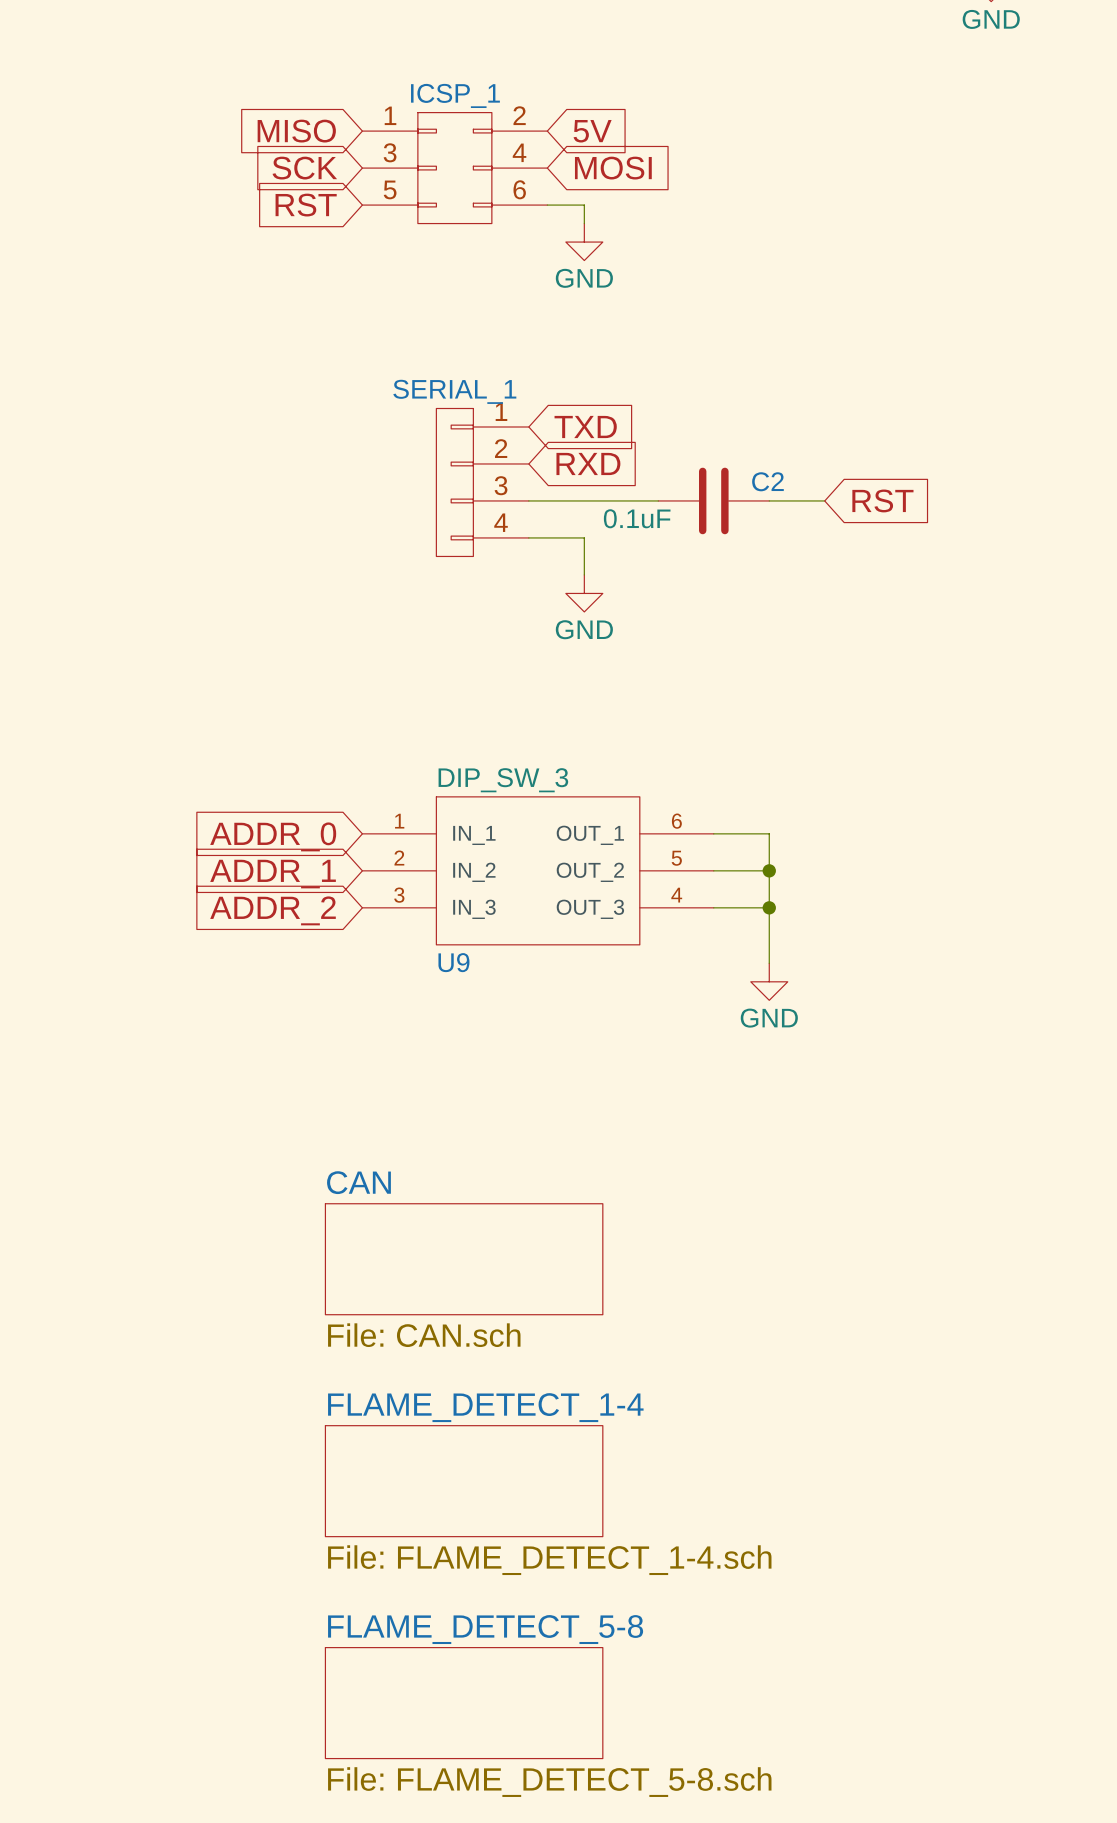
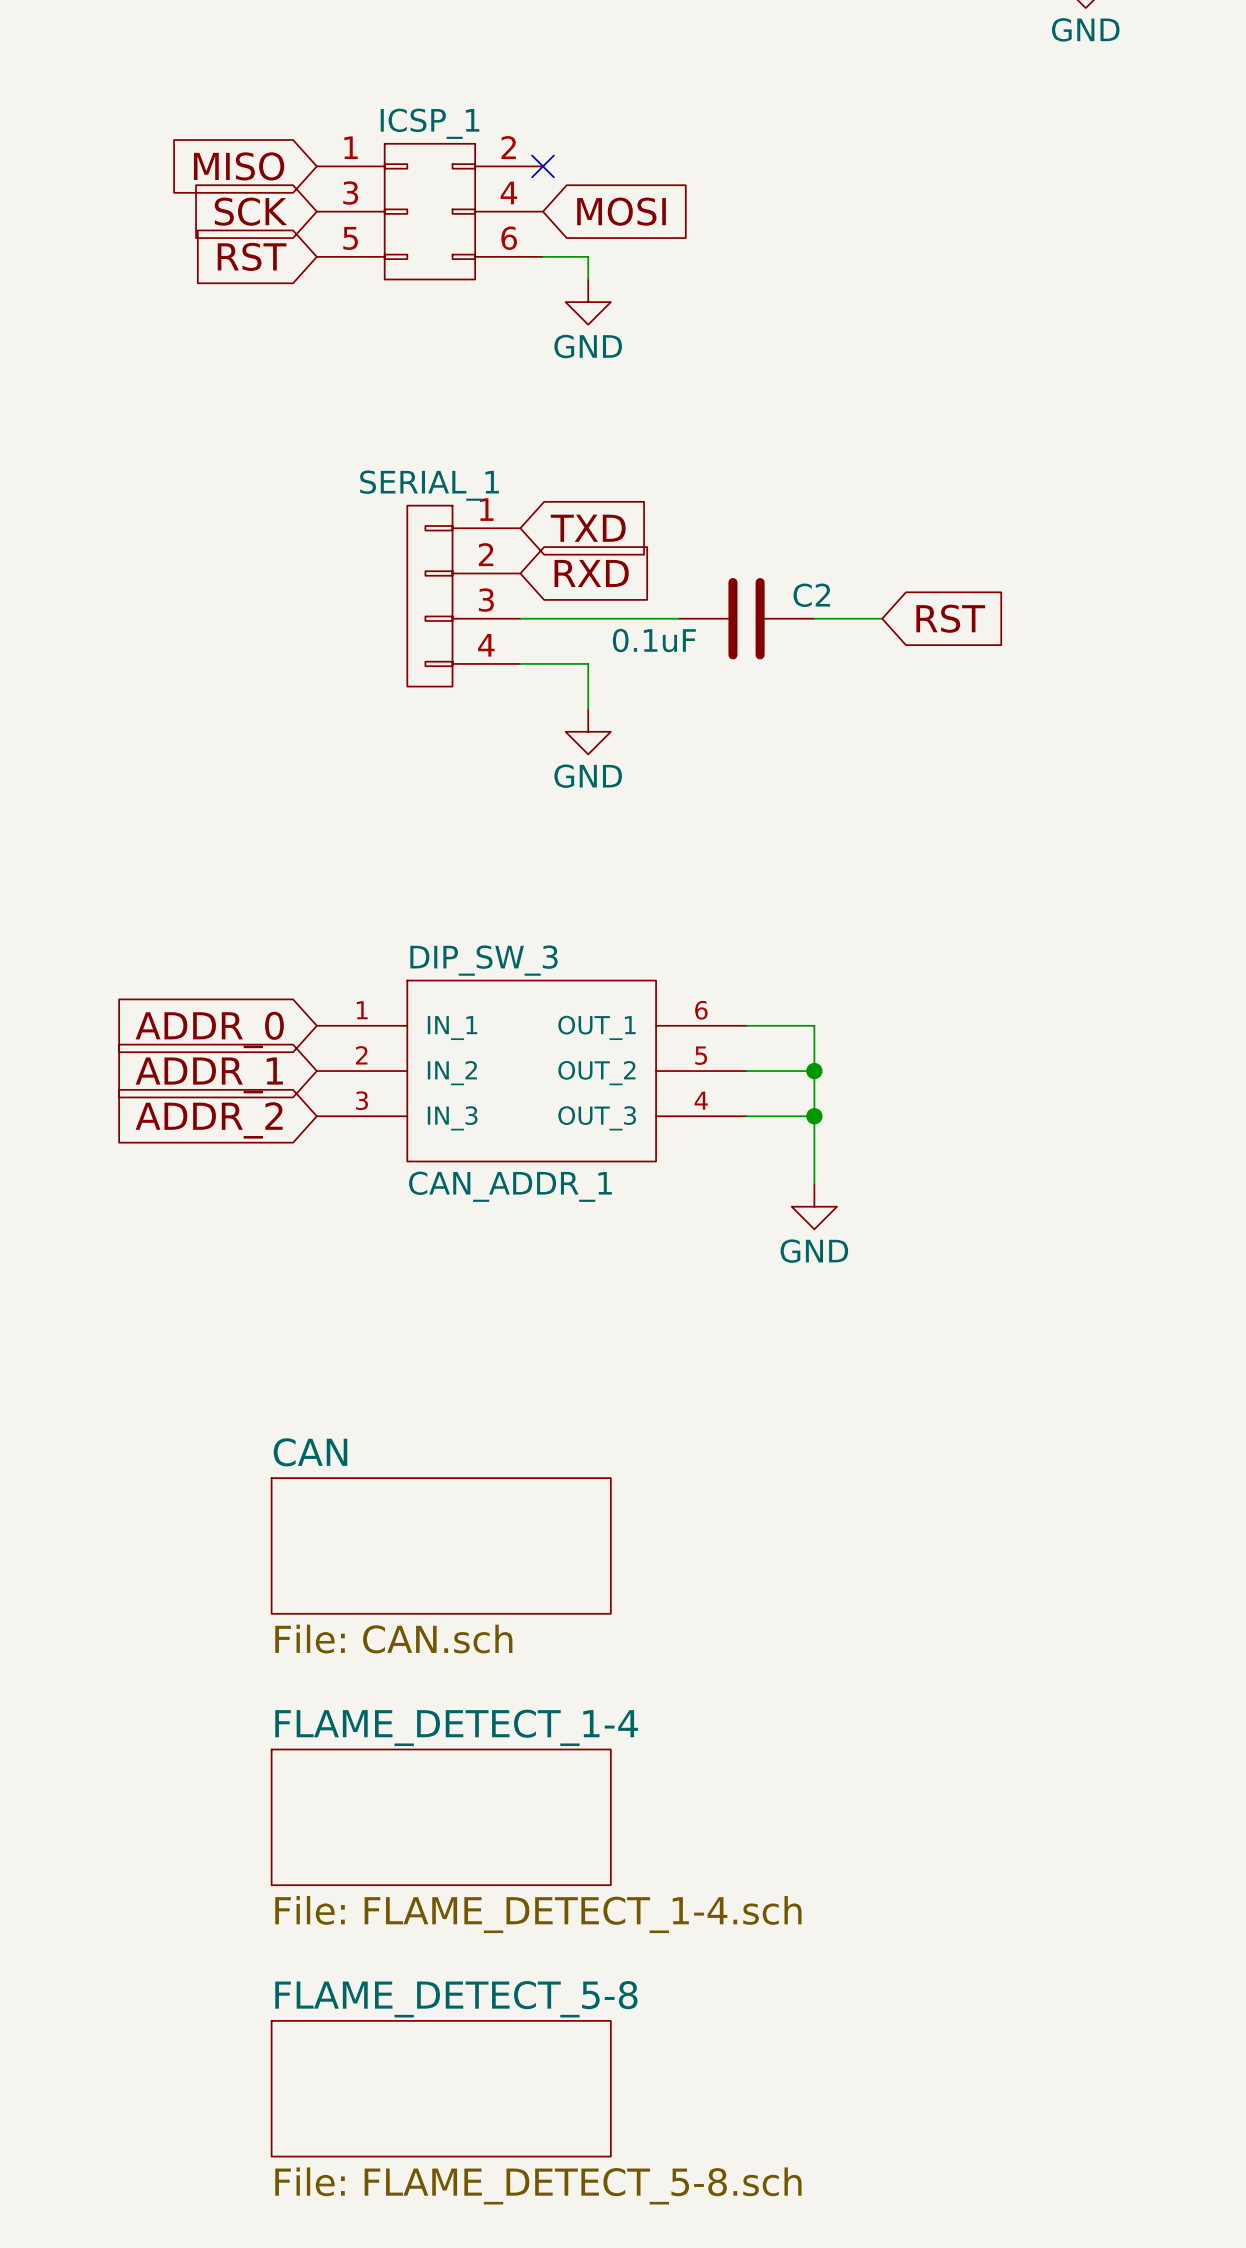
no-connect mark: none -> (542, 166)
global label: 5V (592, 131) -> none
U9 name: U9 (453, 962) -> CAN_ADDR_1 (510, 1186)

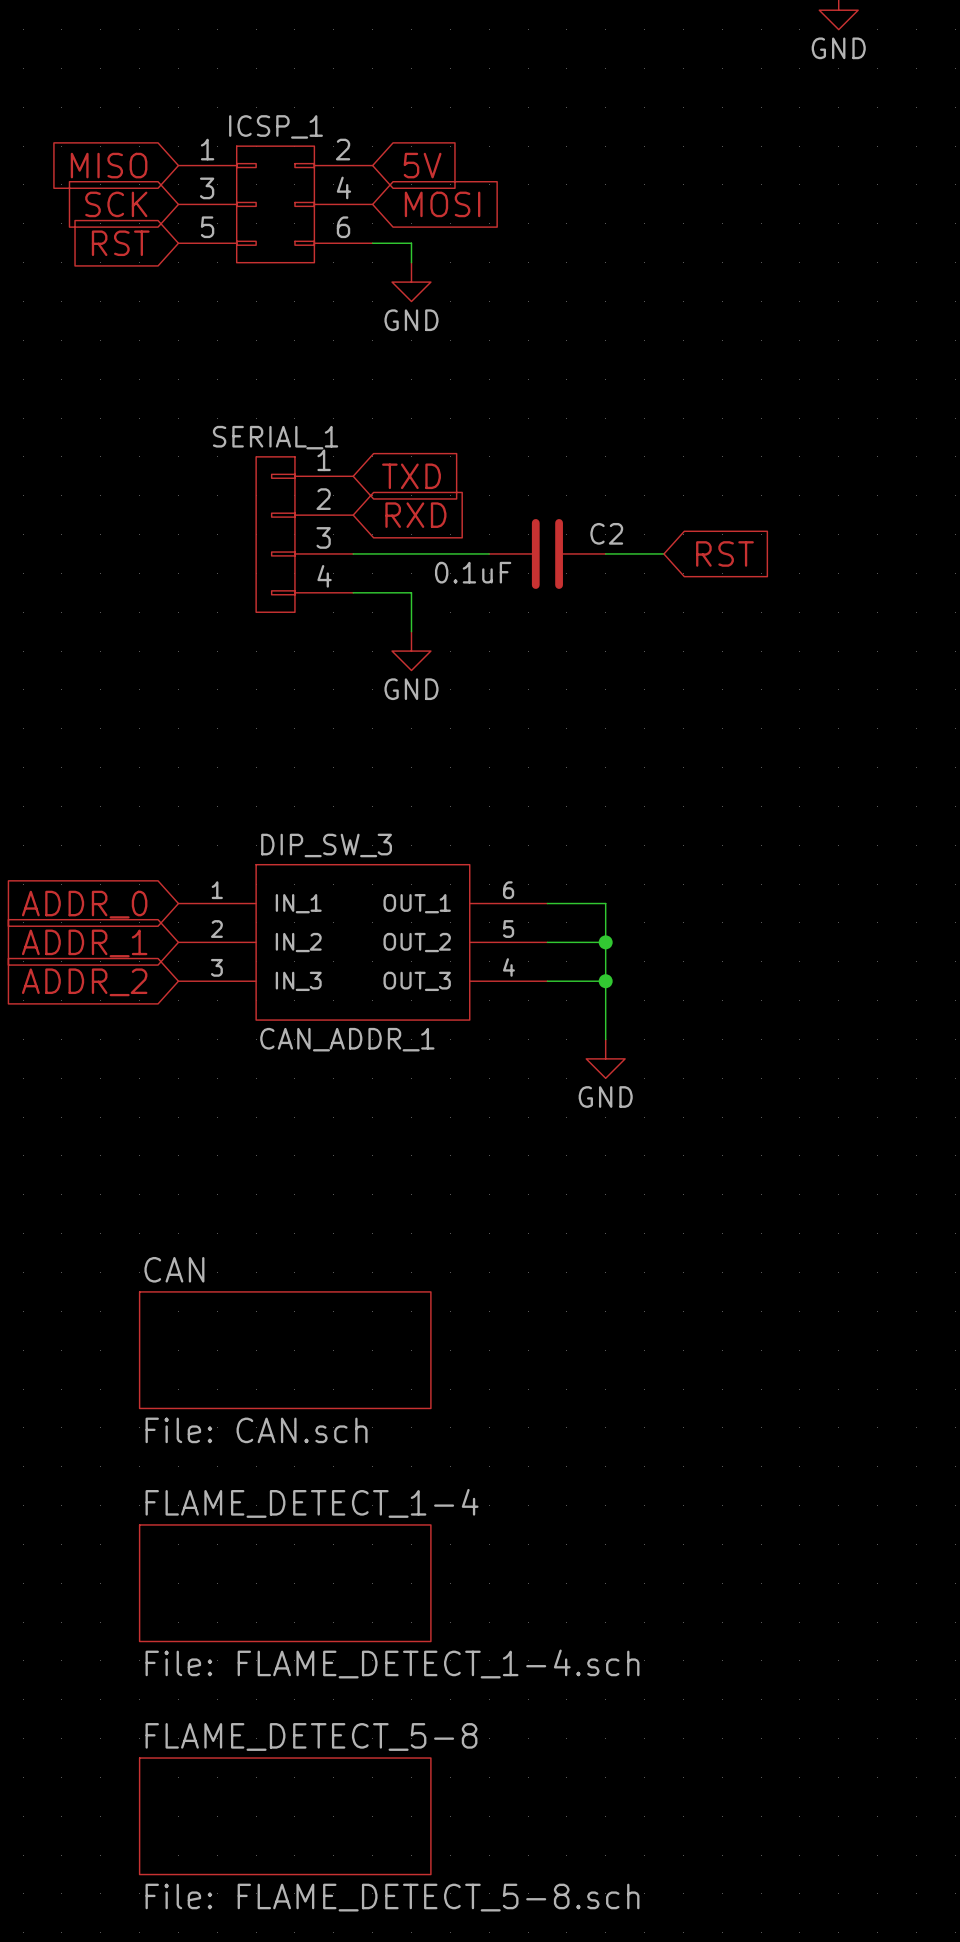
no-connect mark: (542, 166) -> none
global label: none -> 5V (422, 165)

